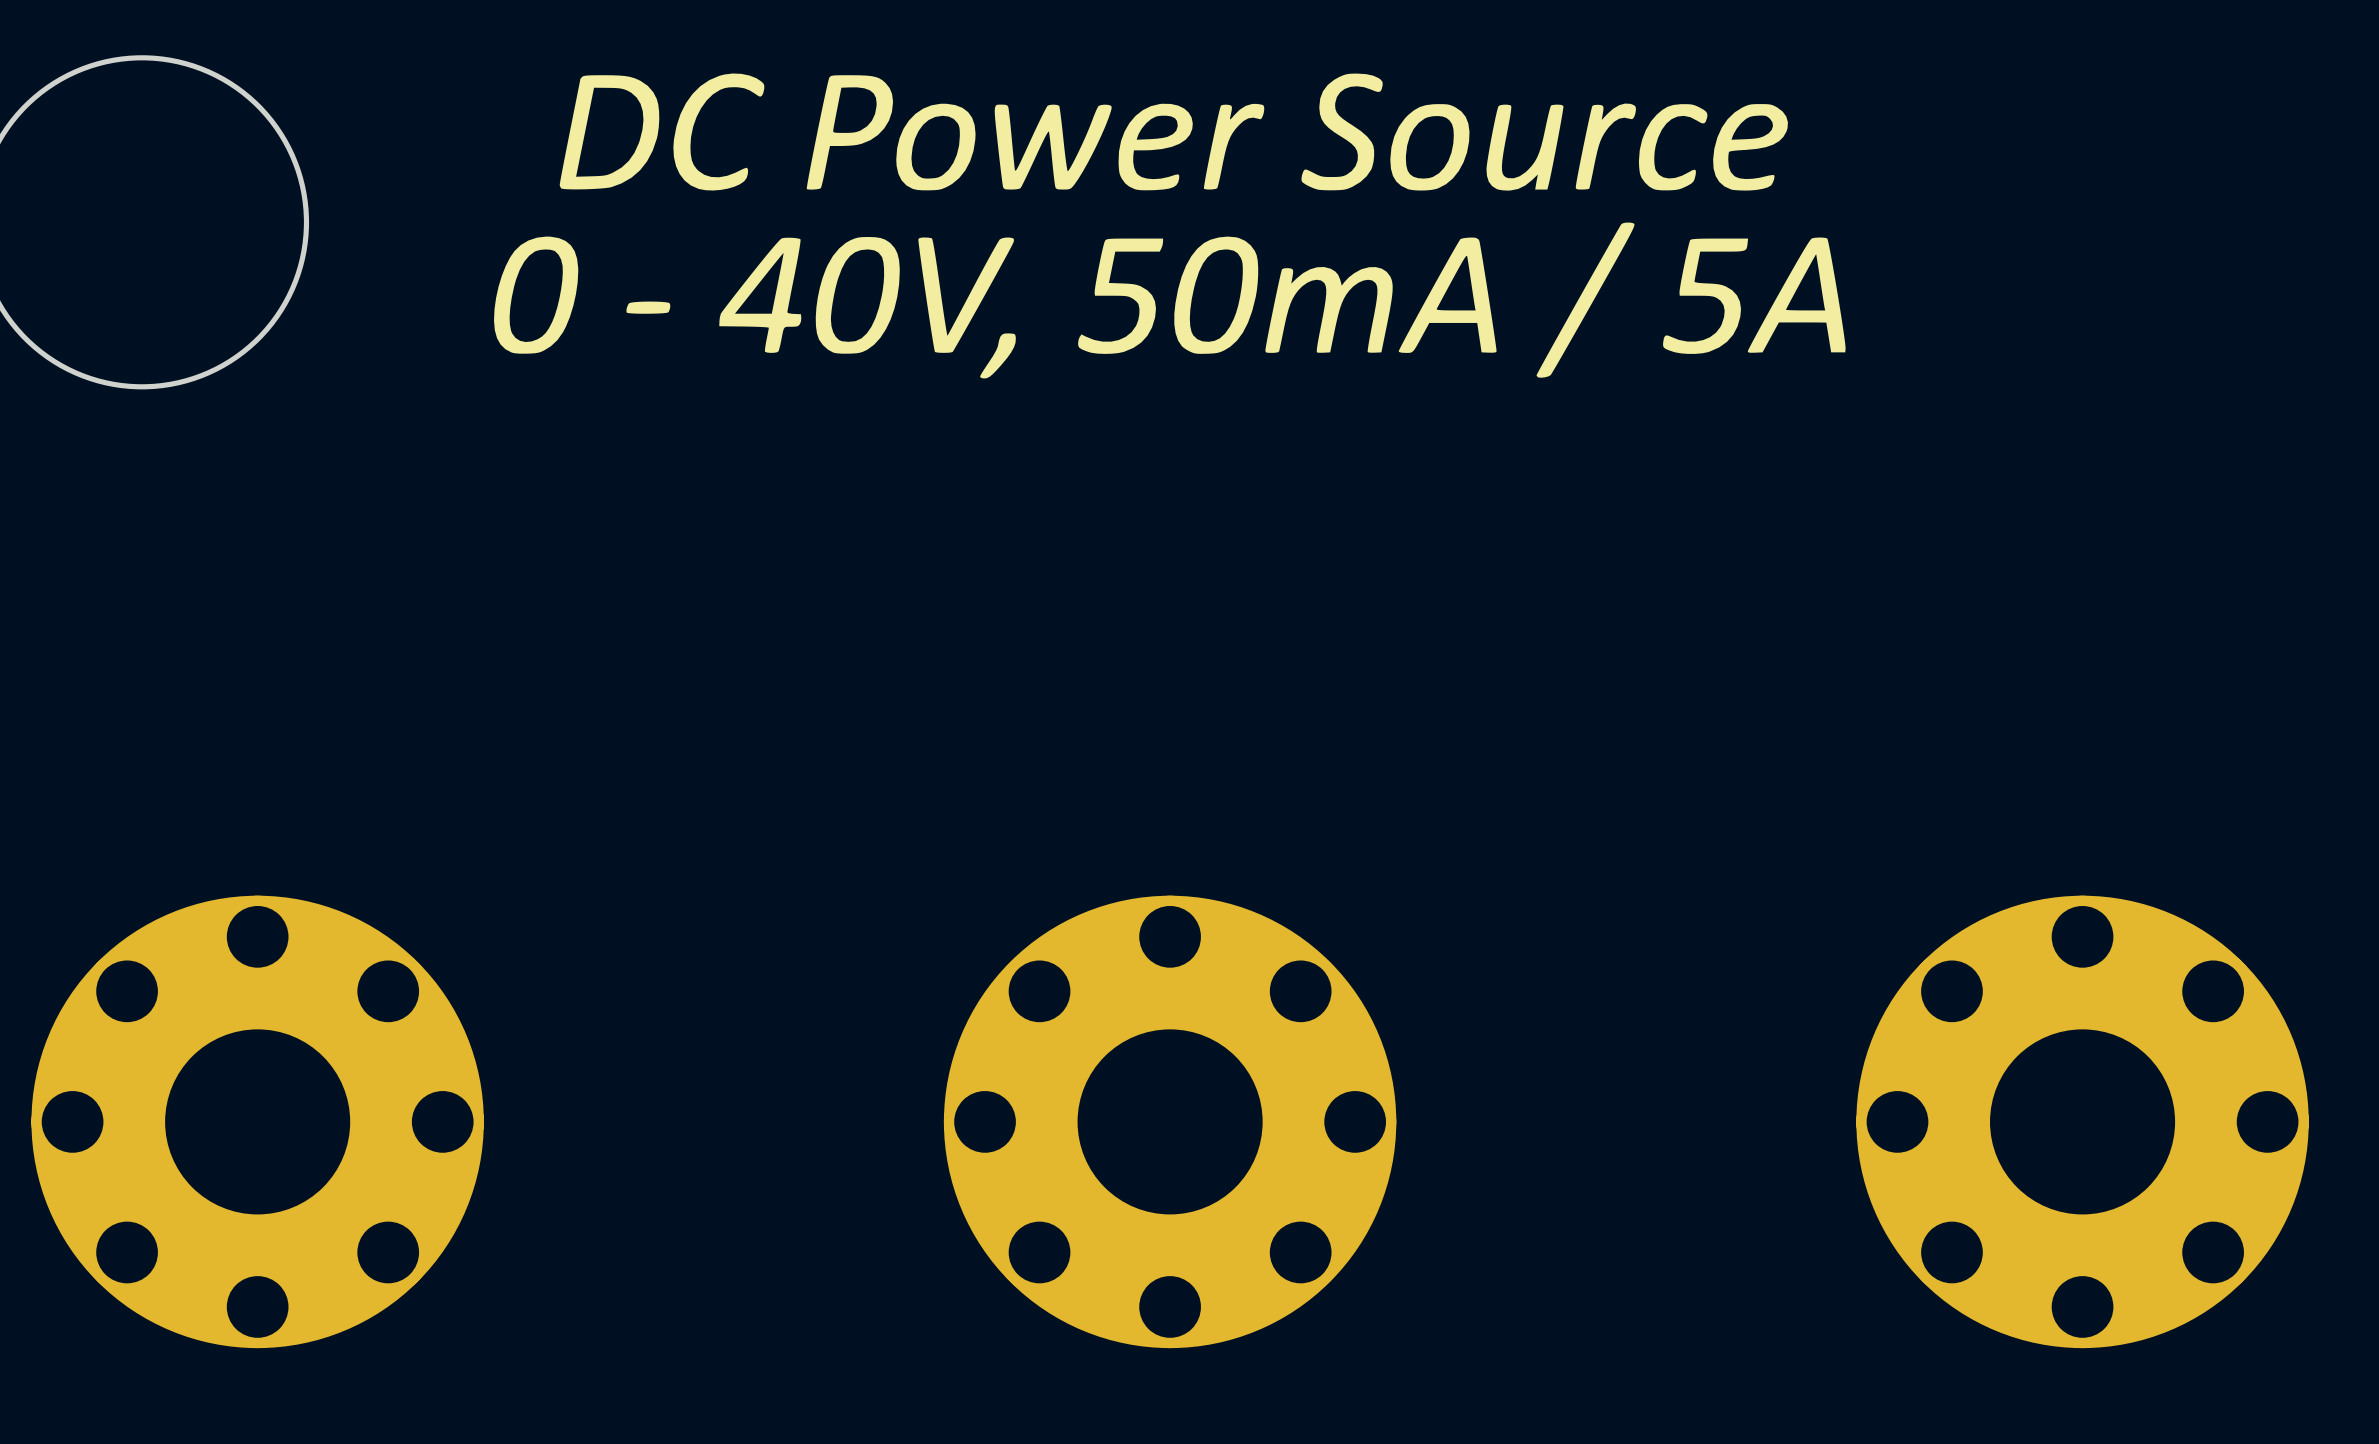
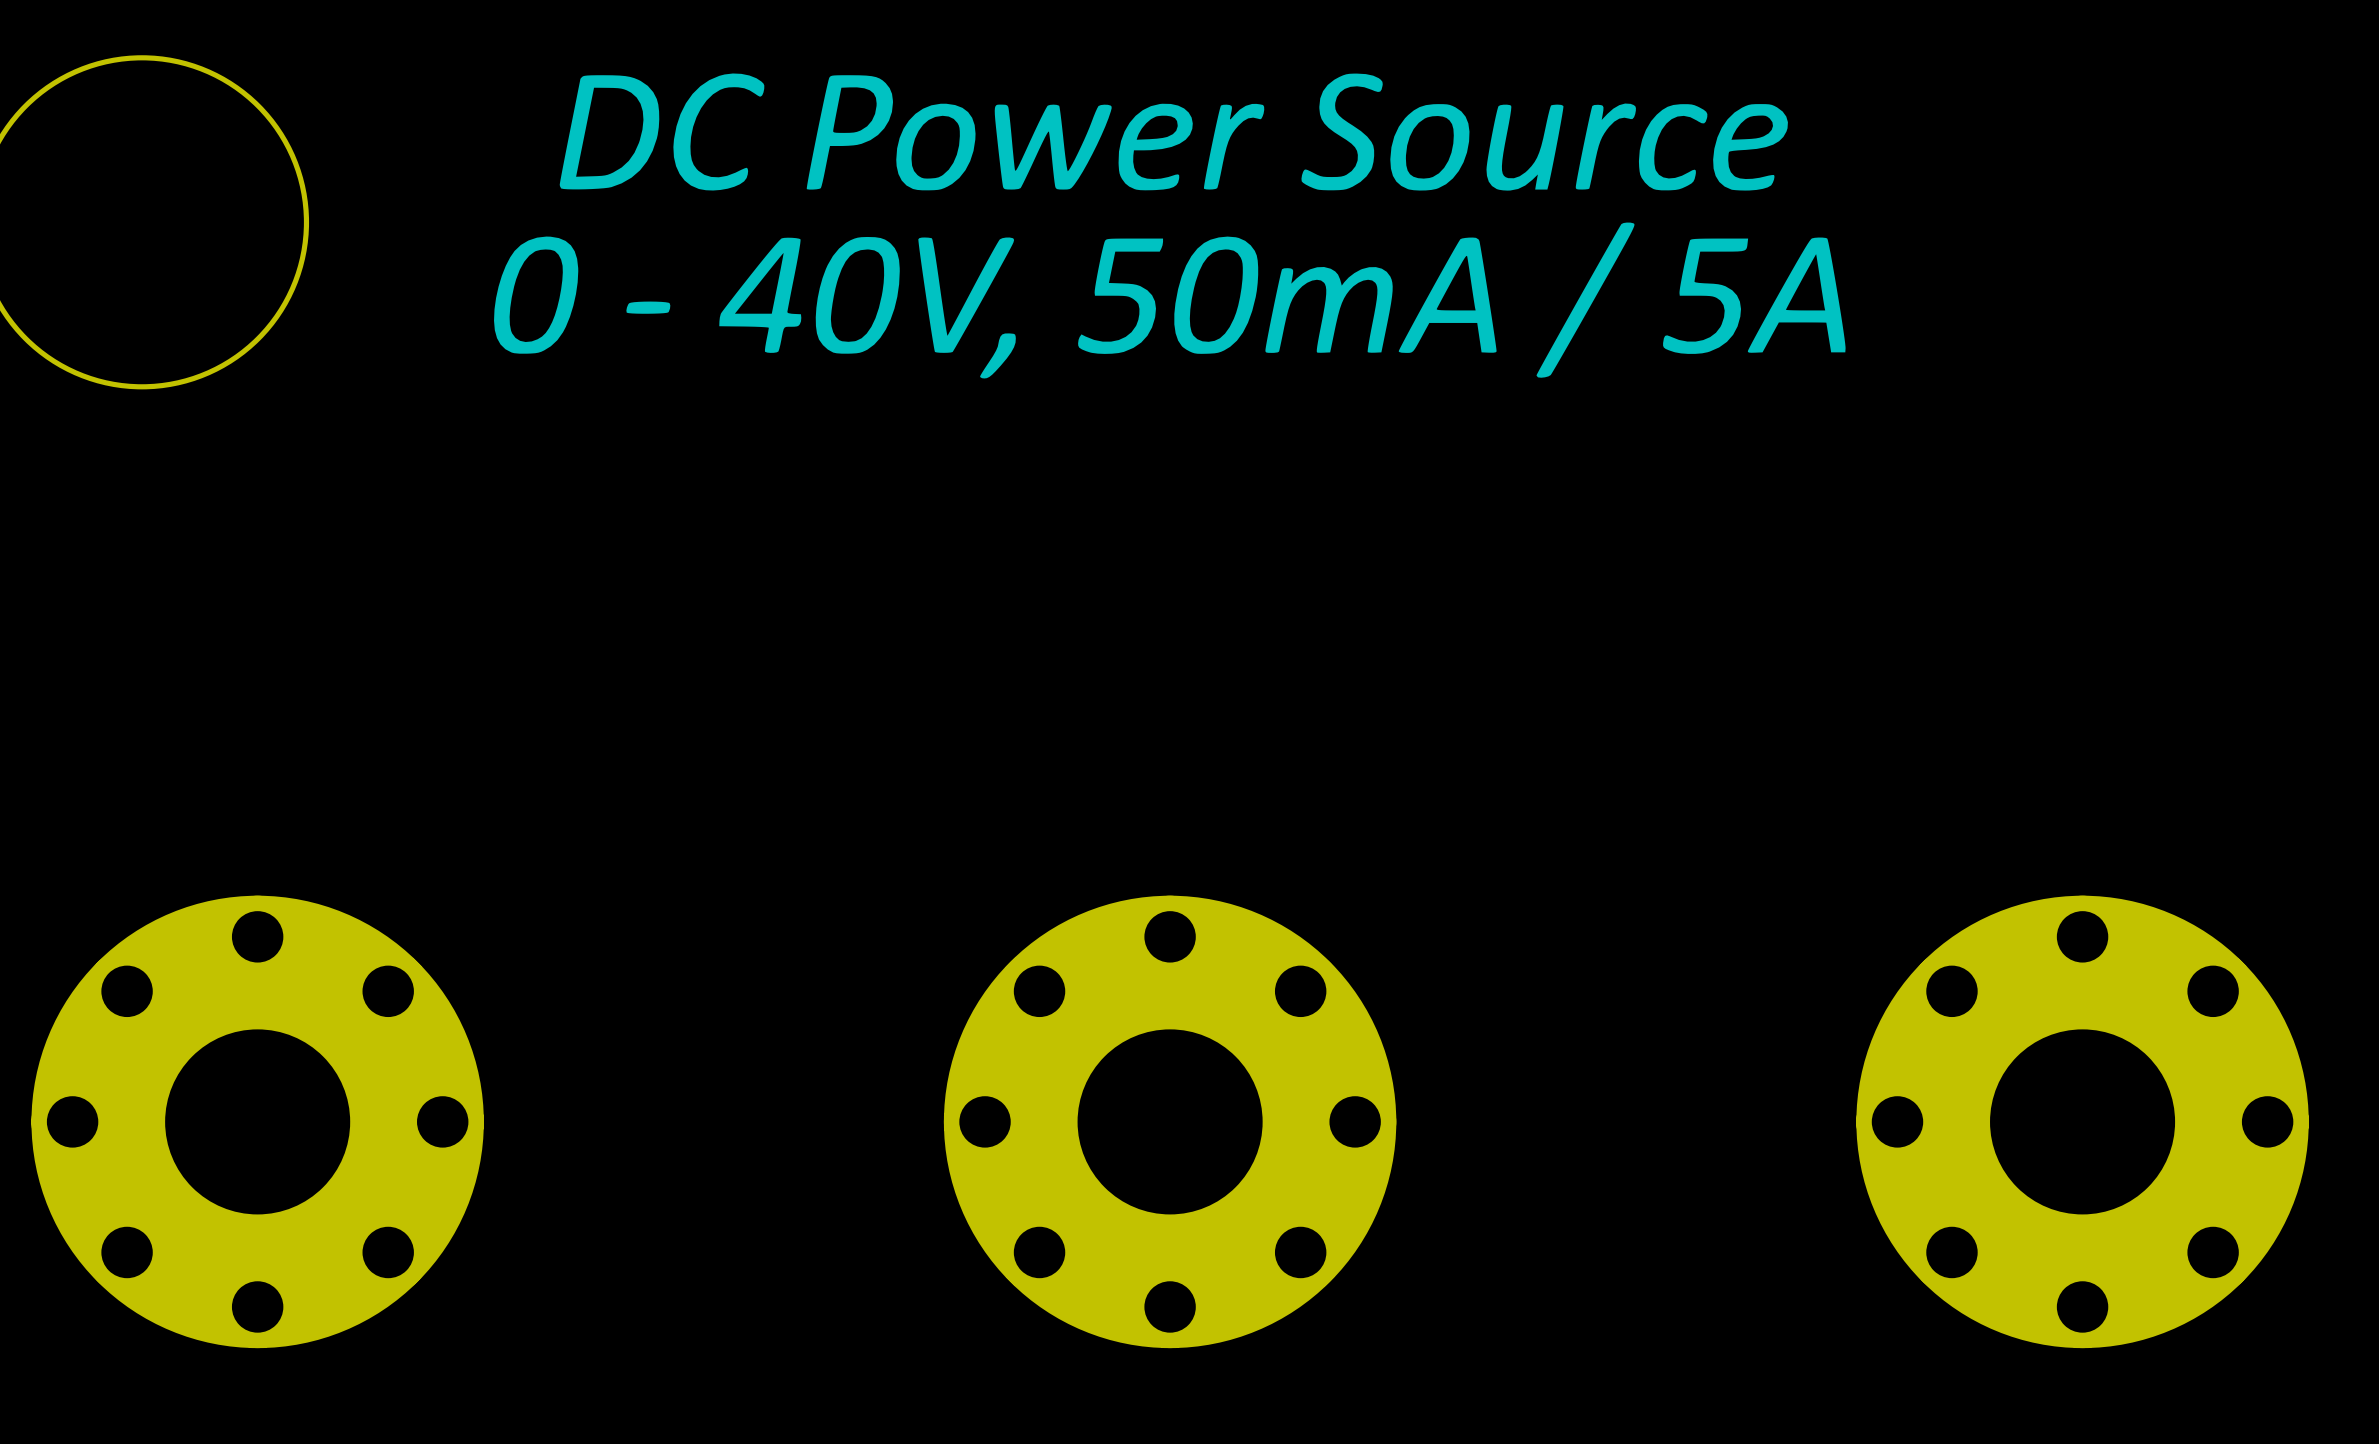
part footprint: [31, 895, 484, 1349] -> [31, 895, 484, 1349]
part footprint: [943, 895, 1397, 1349] -> [943, 895, 1397, 1349]
part footprint: [1856, 895, 2309, 1349] -> [1856, 895, 2309, 1349]

